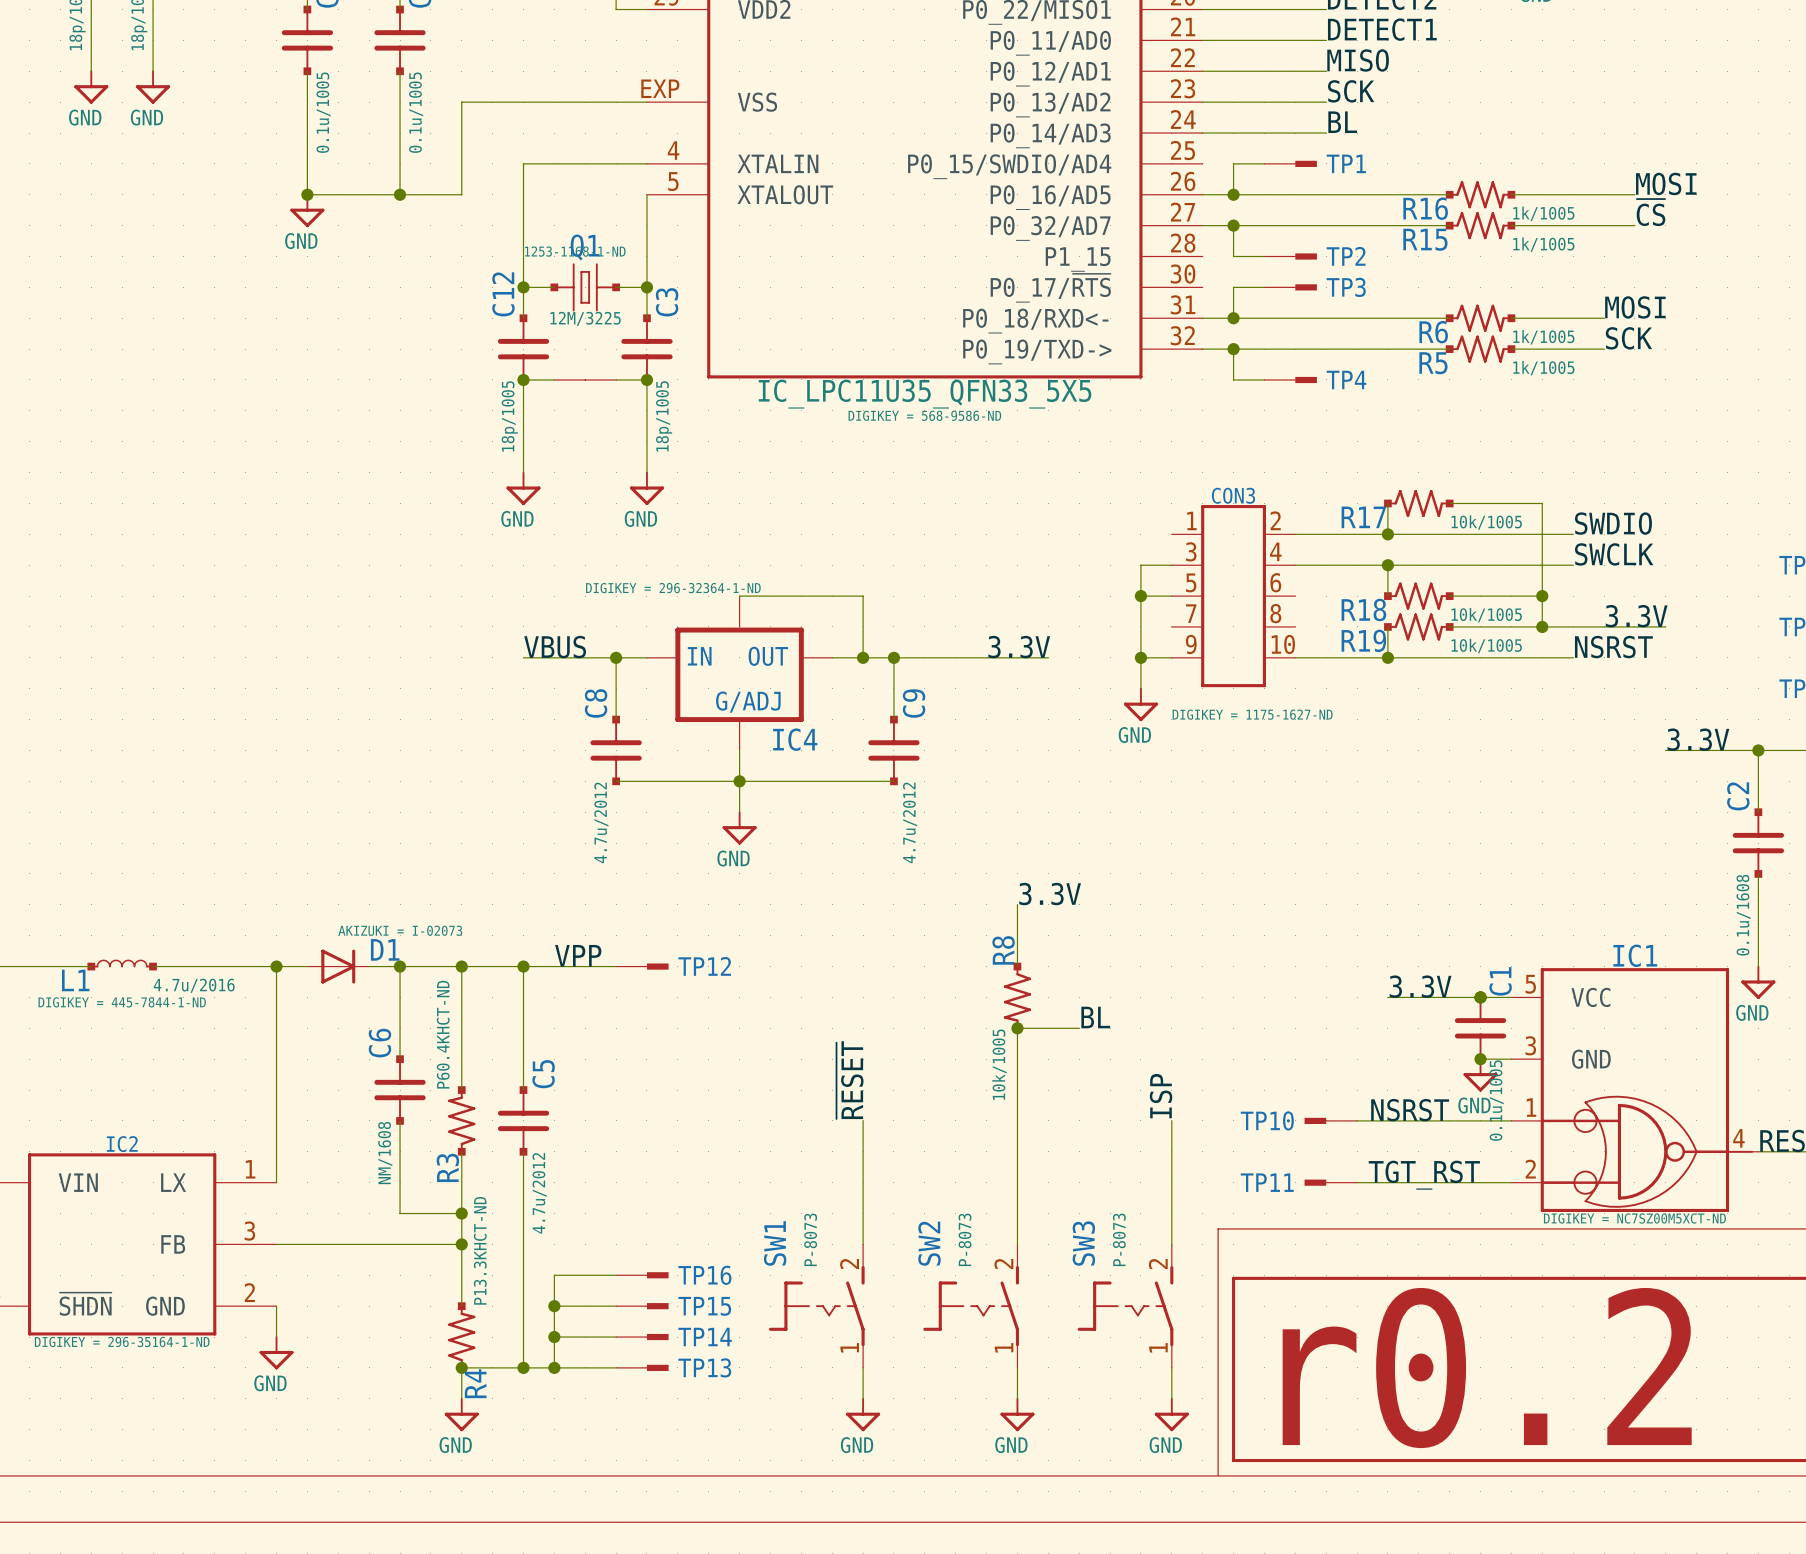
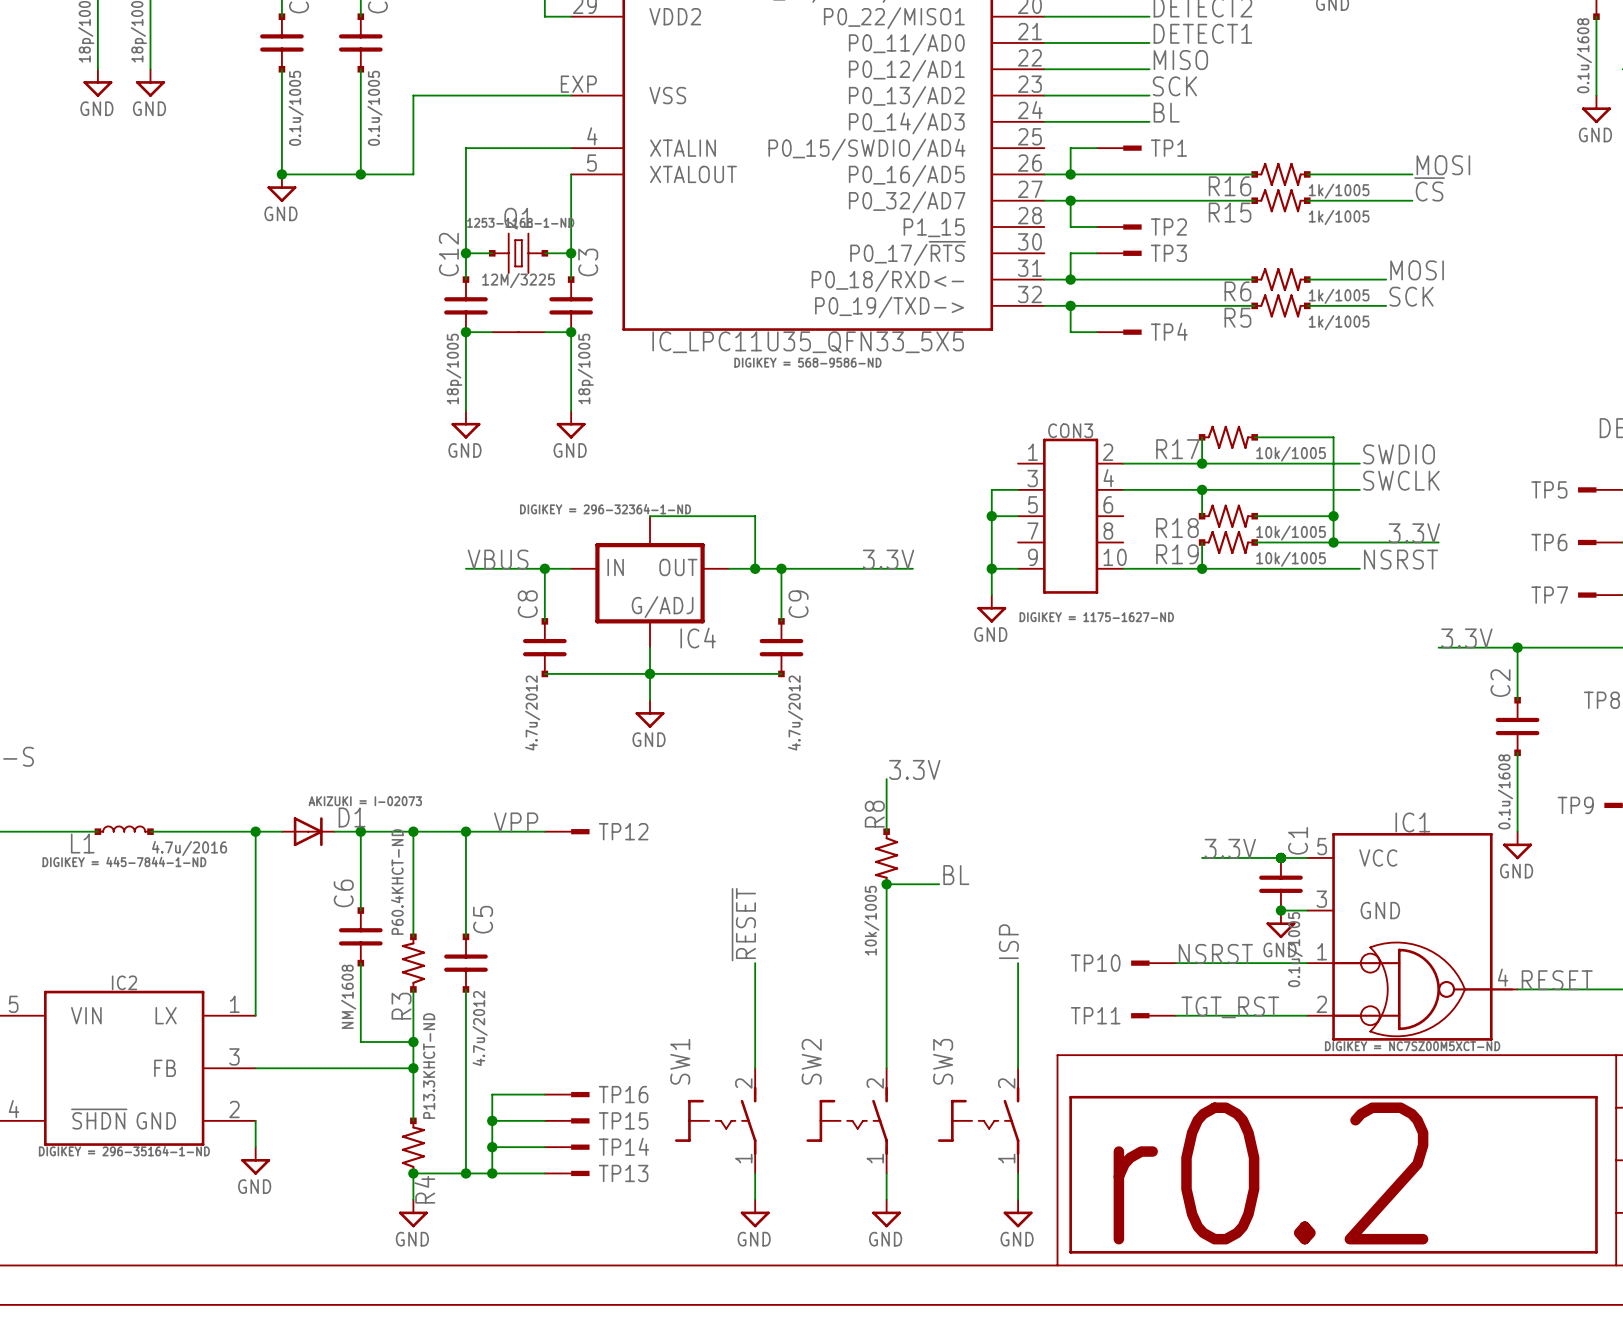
SW1 value: P-8073 (810, 1239) -> none
SW2 value: P-8073 (964, 1239) -> none
SW3 value: P-8073 (1119, 1239) -> none

